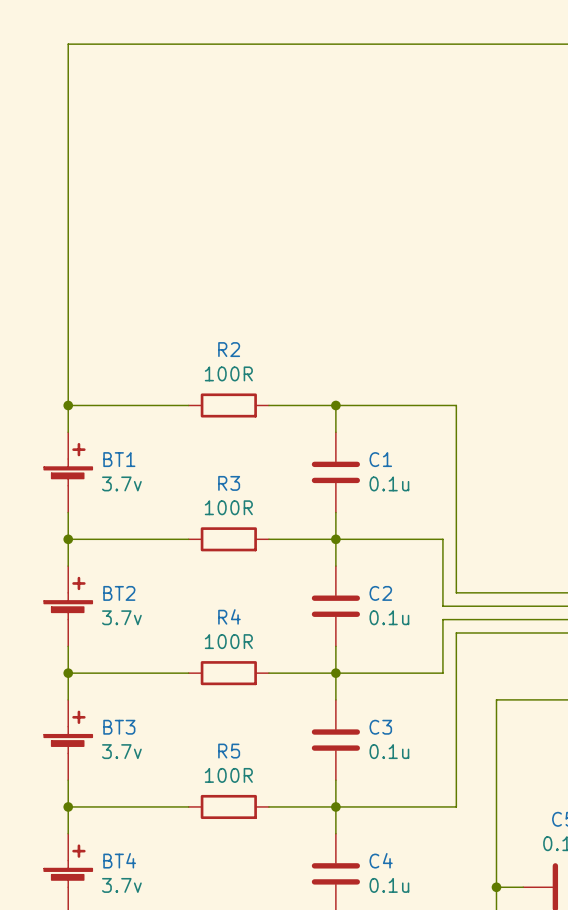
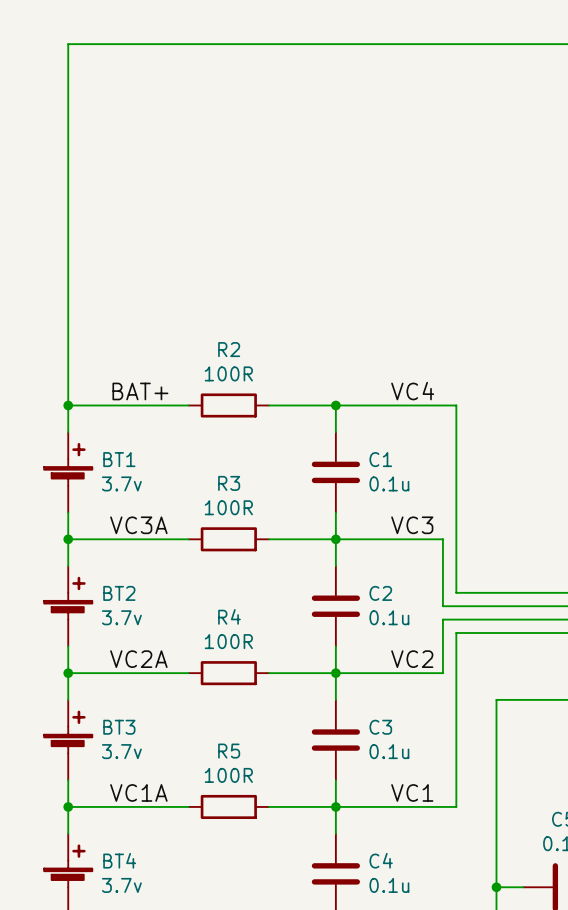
label: none -> BAT+ (140, 391)
label: none -> VC4 (412, 391)
label: none -> VC3A (138, 525)
label: none -> VC3 (412, 525)
label: none -> VC2A (138, 659)
label: none -> VC2 (412, 659)
label: none -> VC1A (138, 792)
label: none -> VC1 (412, 792)

